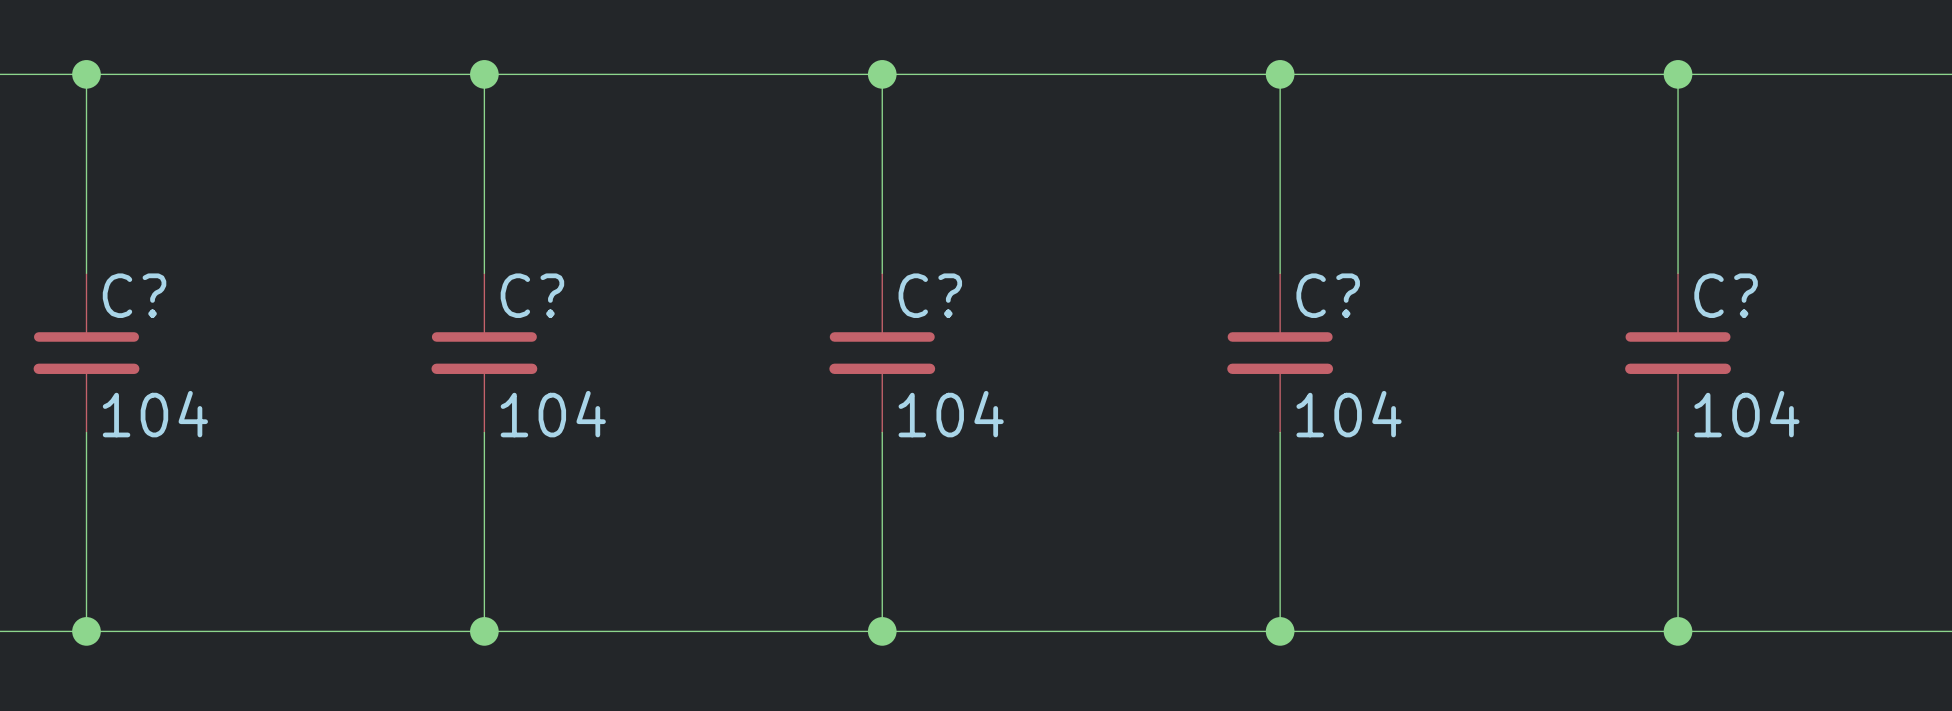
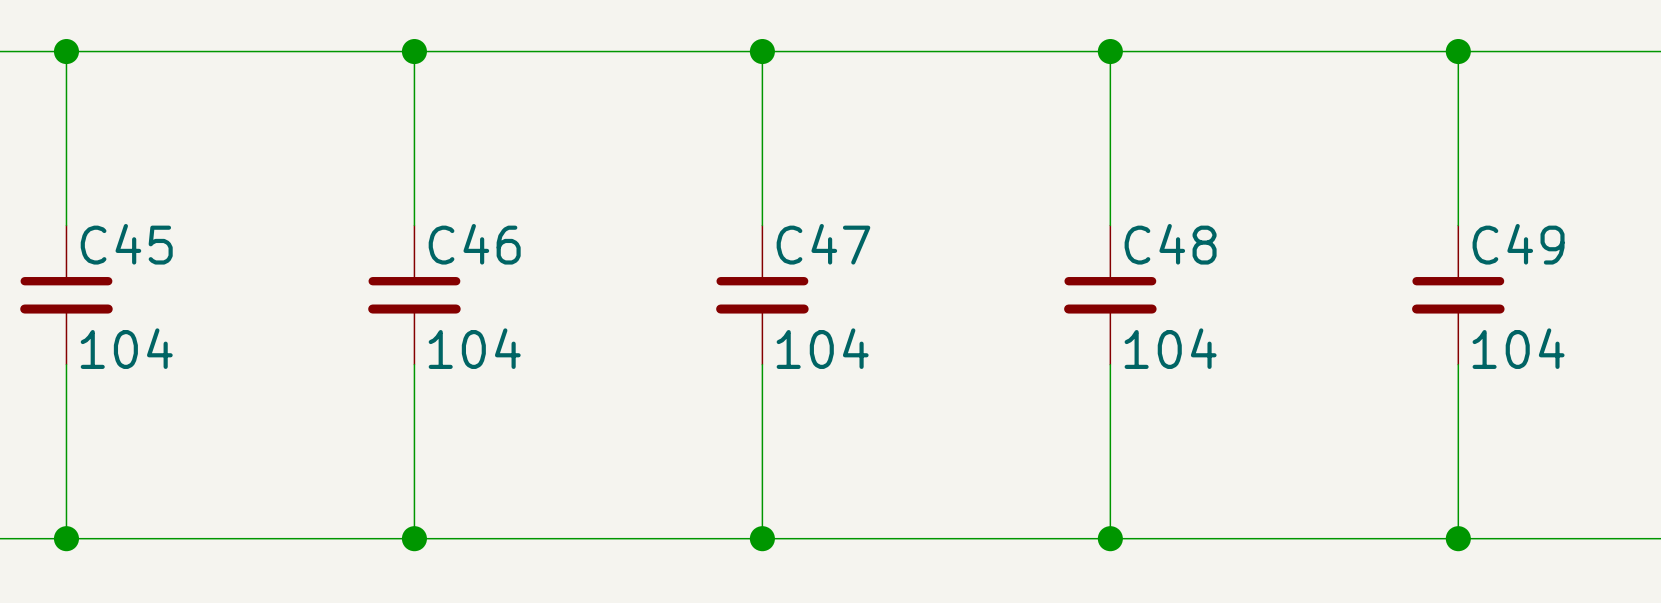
C? name: C? (134, 295) -> C45 (126, 244)
C? name: C? (532, 295) -> C46 (474, 244)
C? name: C? (930, 295) -> C47 (823, 244)
C? name: C? (1328, 295) -> C48 (1170, 244)
C? name: C? (1726, 295) -> C49 (1518, 244)

